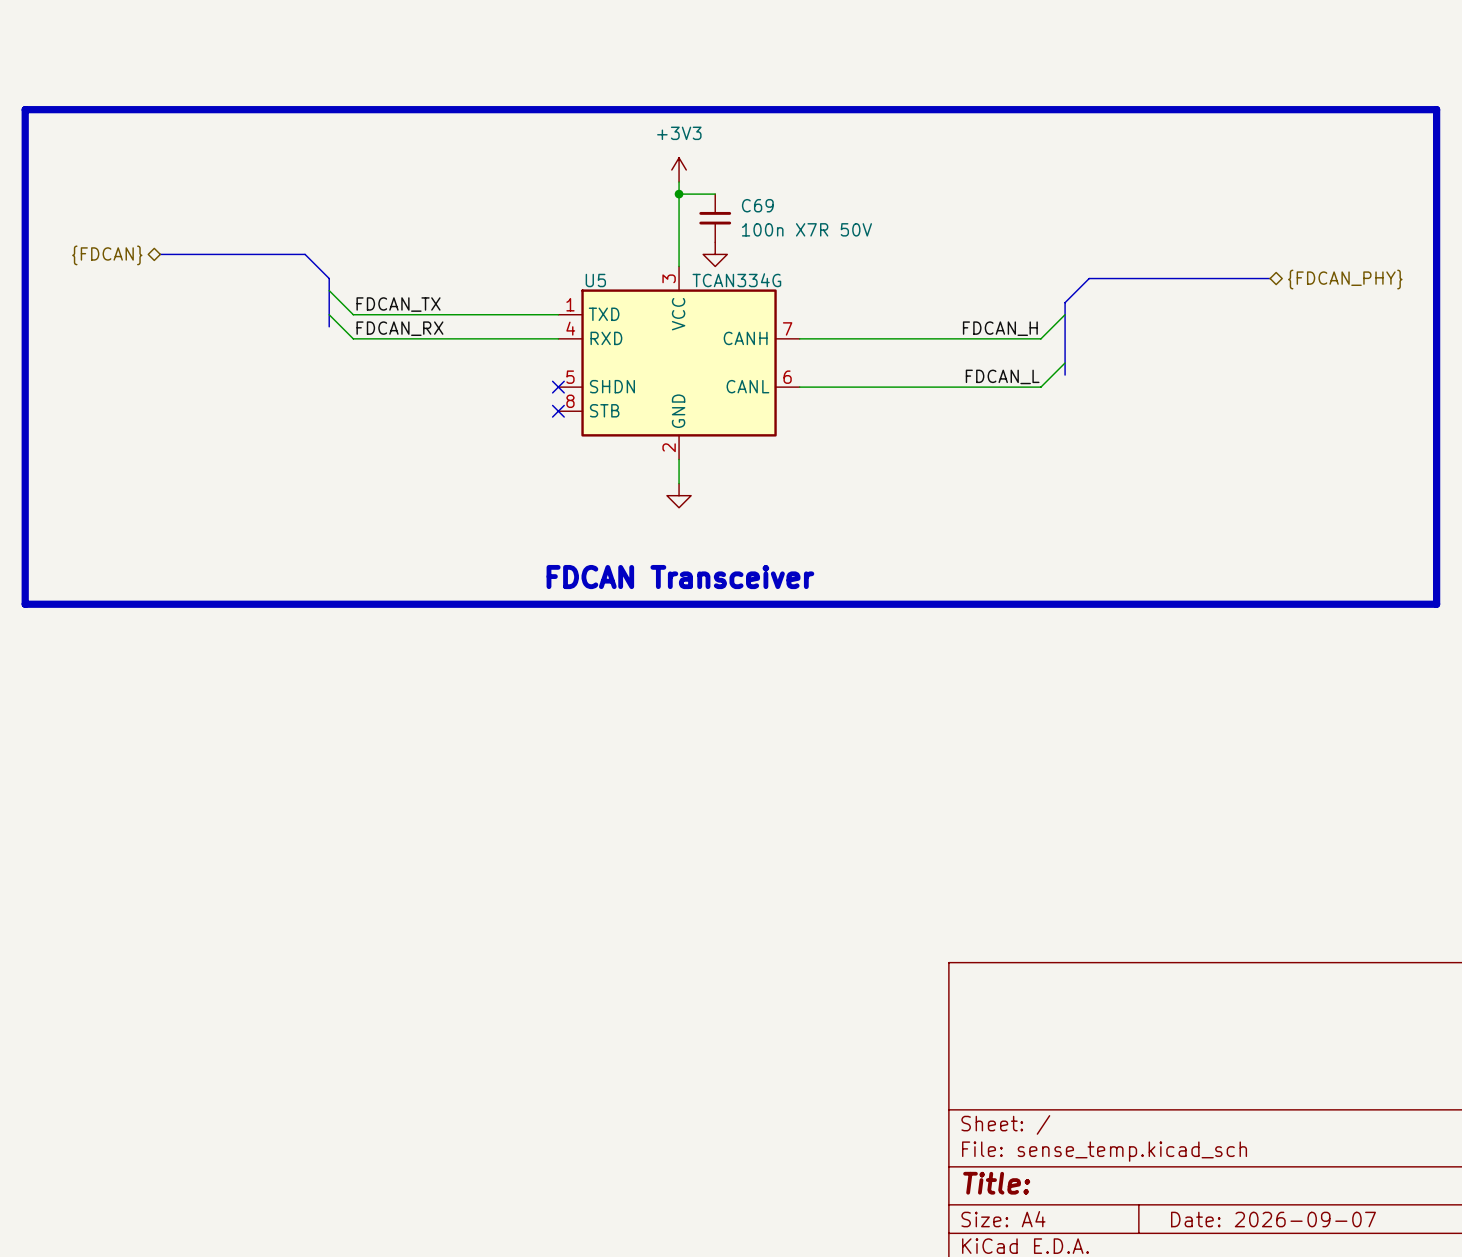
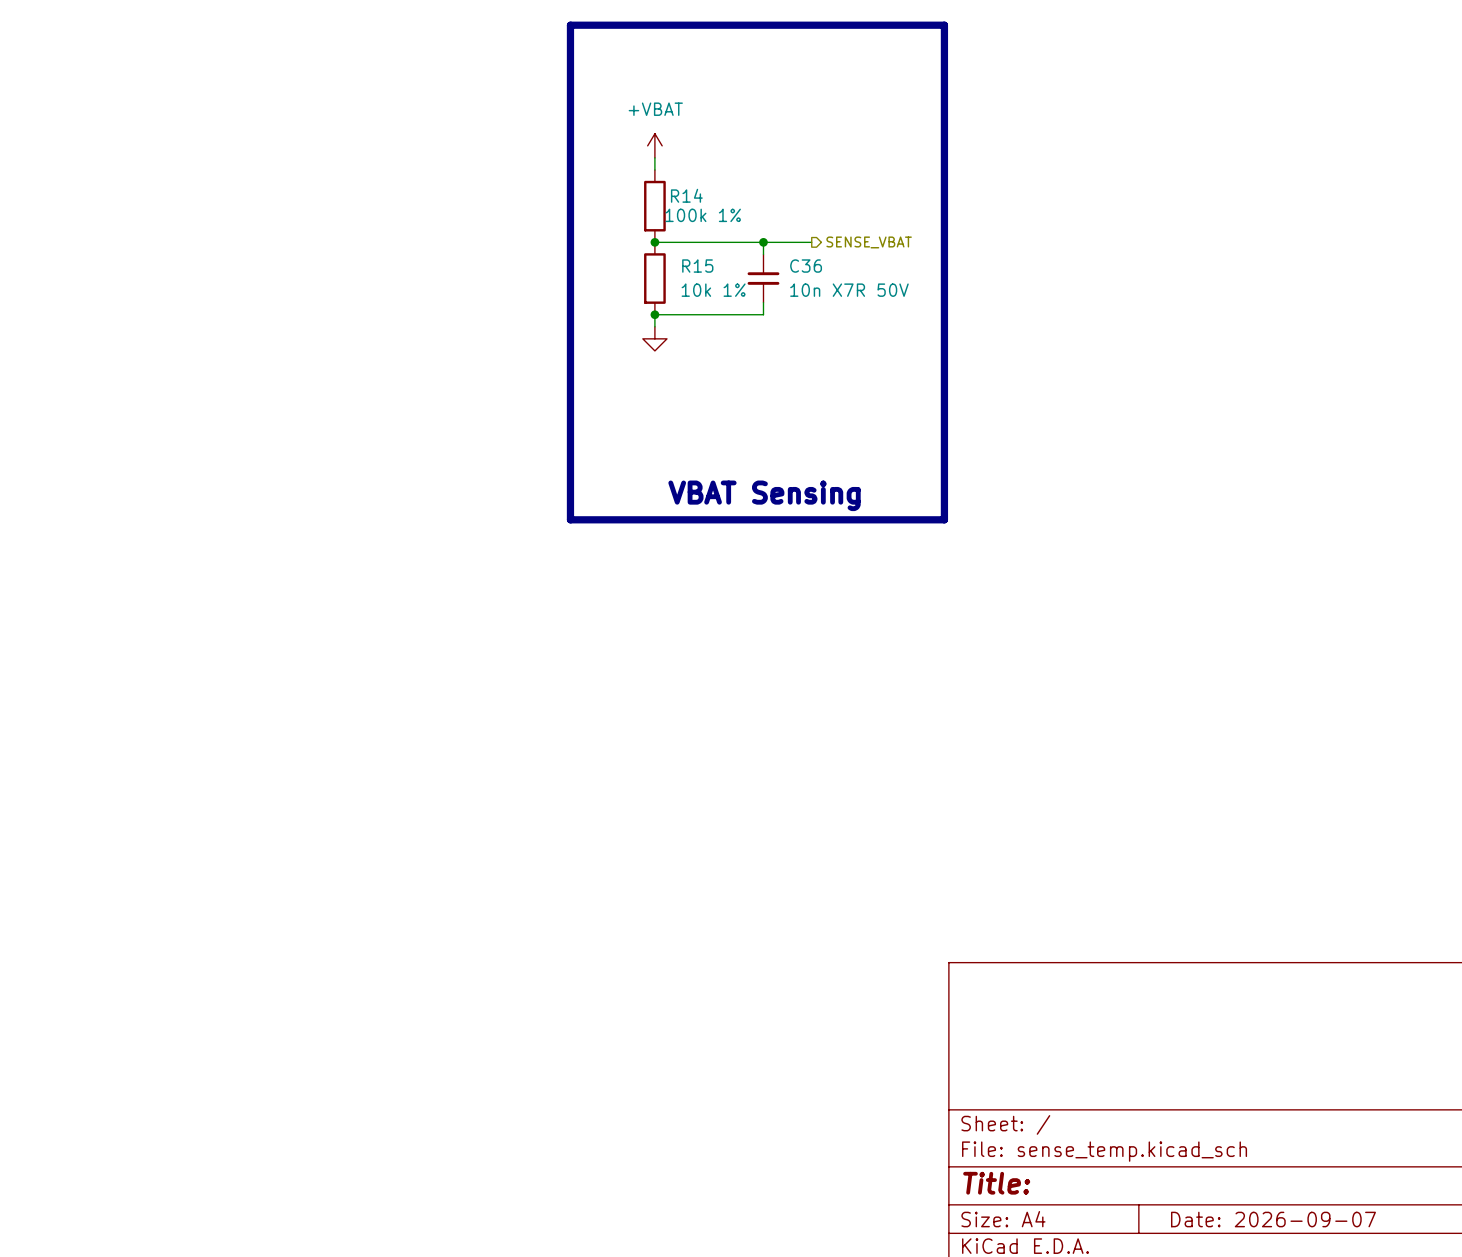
line: none -> (570, 25) (944, 25) (944, 519) (570, 519) (570, 25)
line: (25, 109) (1436, 109) (1436, 604) (25, 604) (25, 109) -> none
power symbol: none -> +VBAT (654, 145)
wire: none -> (654, 157) (654, 169)
power symbol: +3V3 (679, 169) -> none
wire: (679, 182) (679, 266) -> none
wire: (679, 194) (715, 194) -> none
junction: (679, 194) -> none
R14: none -> 100k 1% (654, 206)
C69: 100n X7R 50V (715, 218) -> none
wire: none -> (654, 242) (811, 242)
junction: none -> (654, 242)
wire: none -> (763, 242) (763, 254)
junction: none -> (763, 242)
hierarchical label: none -> SENSE_VBAT (869, 242)
bus: (160, 254) (305, 254) (329, 278) (329, 326) -> none
power symbol: (715, 254) -> none
hierarchical label: {FDCAN} (107, 255) -> none
R15: none -> 10k 1% (654, 278)
C36: none -> 10n X7R 50V (763, 278)
bus: (1270, 278) (1089, 278) (1065, 302) (1065, 375) -> none
hierarchical label: {FDCAN_PHY} (1345, 279) -> none
wire: (329, 290) (353, 314) (558, 314) -> none
label: FDCAN_TX (398, 304) -> none
wire: (329, 314) (353, 338) (558, 338) -> none
junction: none -> (654, 314)
wire: (1065, 314) (1040, 338) (799, 338) -> none
label: FDCAN_RX (399, 328) -> none
label: FDCAN_H (1000, 328) -> none
power symbol: none -> (654, 338)
U5: TCAN334G (679, 362) -> none
wire: (1065, 362) (1040, 387) (799, 387) -> none
label: FDCAN_L (1002, 376) -> none
no-connect mark: (558, 387) -> none
no-connect mark: (558, 411) -> none
wire: (679, 459) (679, 483) -> none
power symbol: (679, 495) -> none
text: none -> VBAT Sensing (764, 495)
text: FDCAN Transceiver (680, 577) -> none

